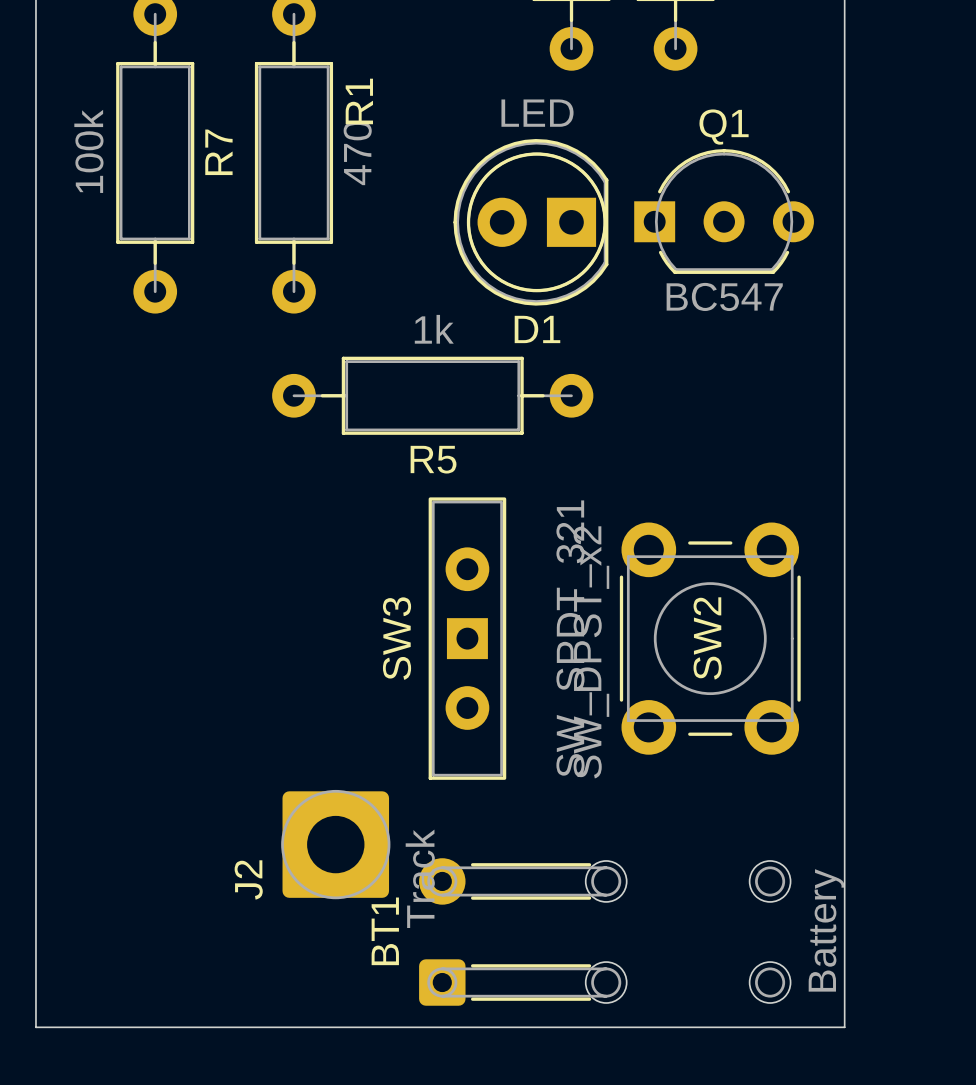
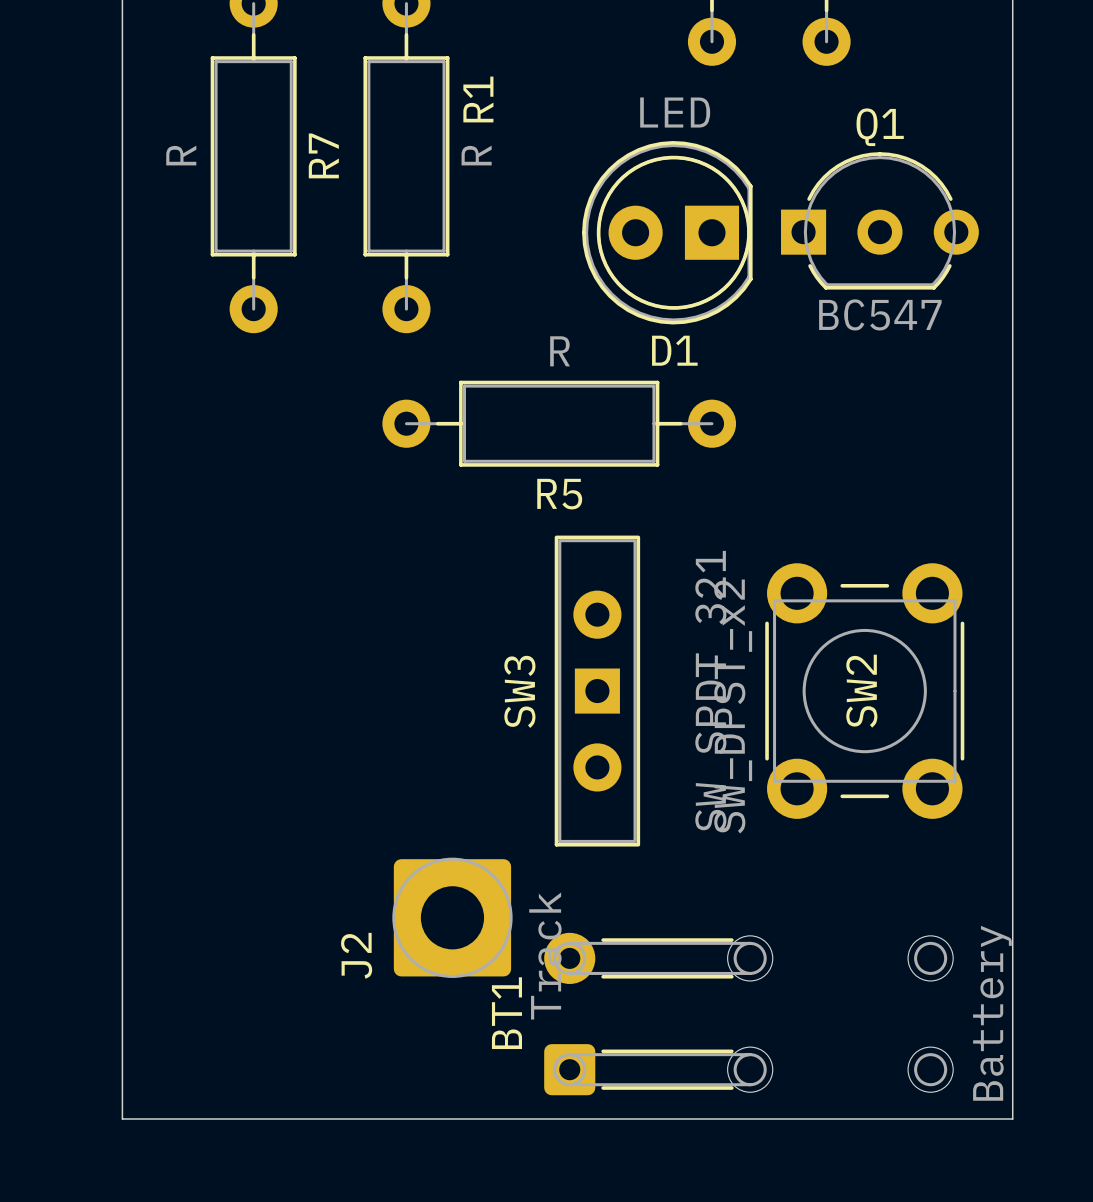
R7 value: 100k (88, 151) -> R (181, 155)
R1 value: 470 (357, 153) -> R (476, 155)
R5 value: 1k (434, 329) -> R (560, 351)

